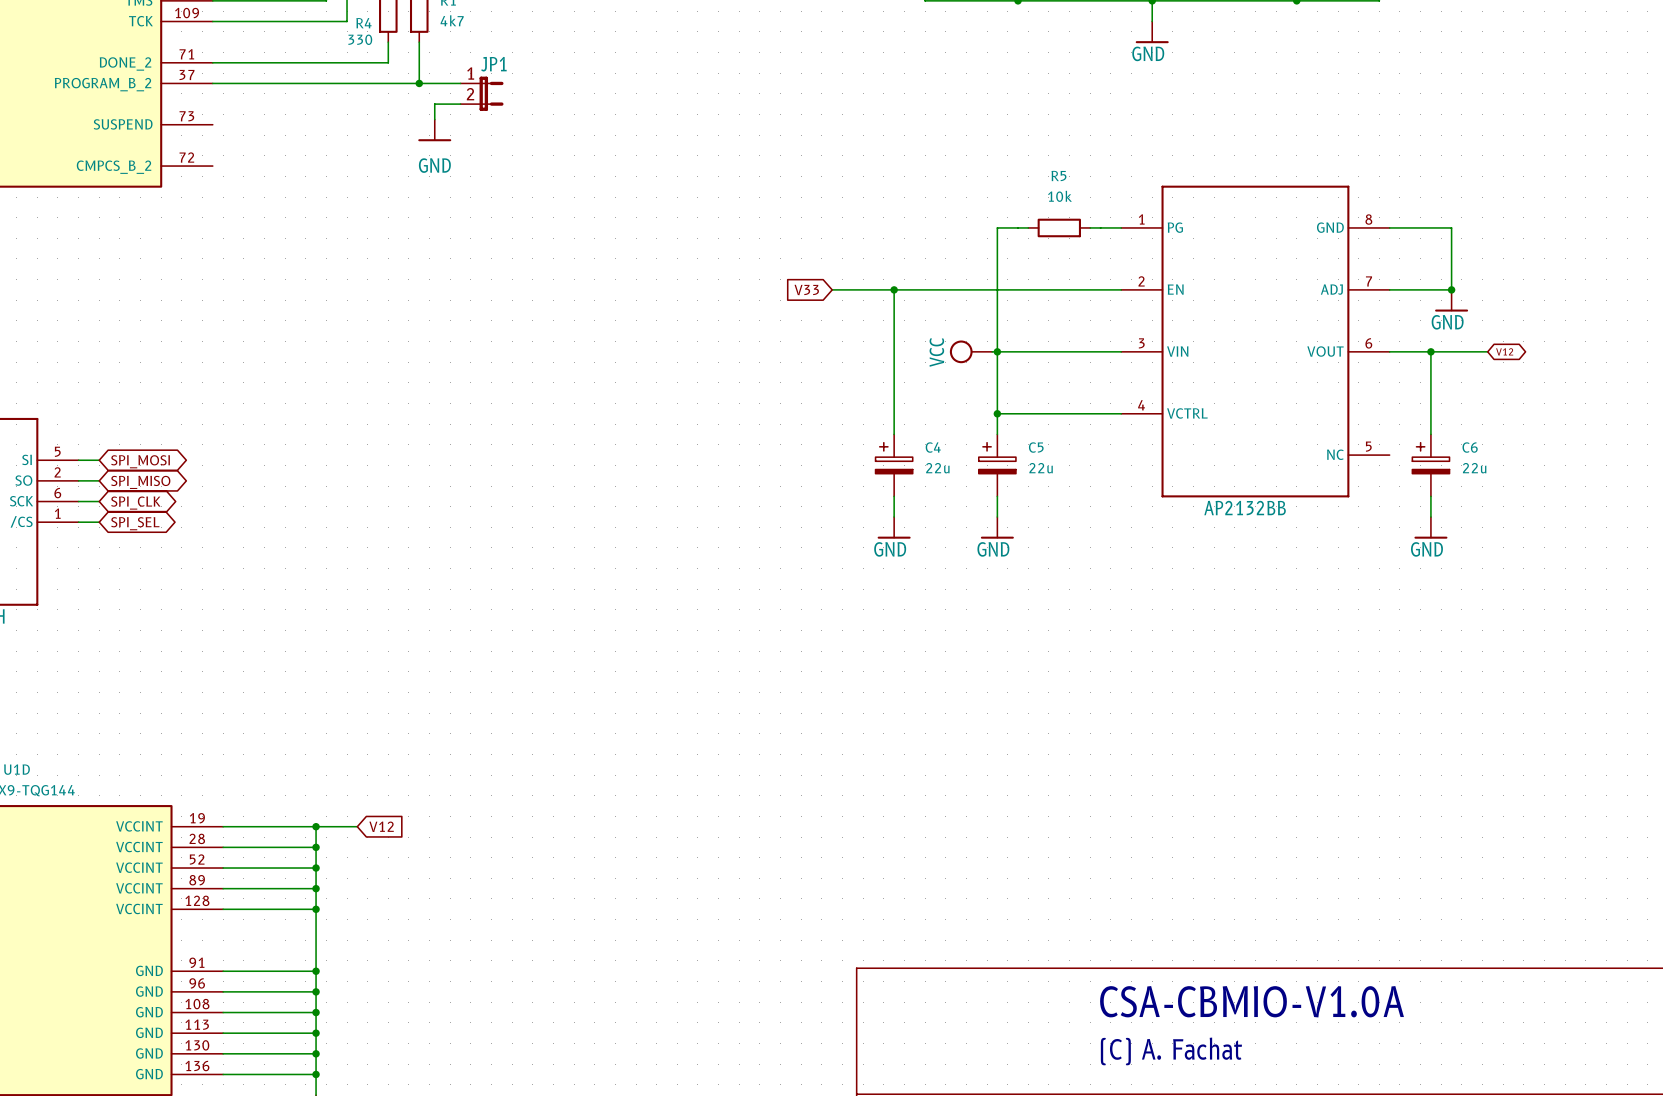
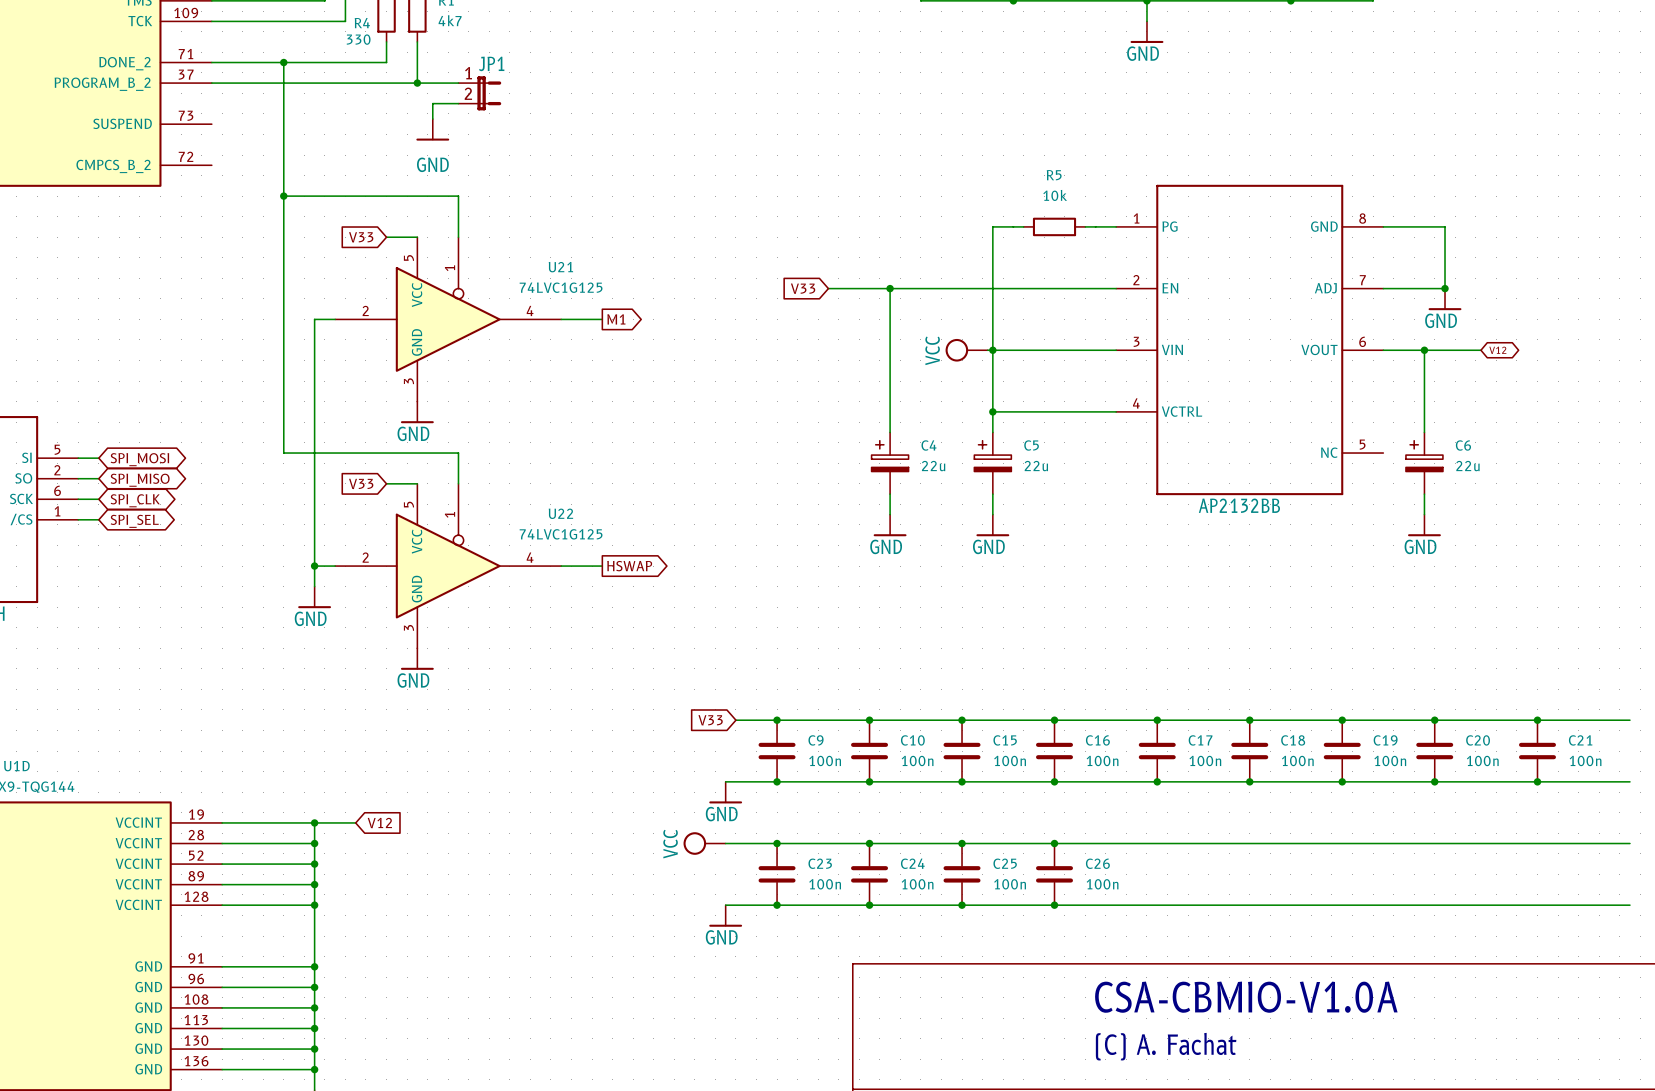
wire: none -> (283, 62) (283, 453) (458, 453) (458, 483)
junction: none -> (283, 62)
wire: none -> (283, 196) (458, 196) (458, 237)
junction: none -> (283, 196)
global label: none -> V33 (361, 237)
wire: none -> (386, 237) (417, 237)
wire: none -> (335, 319) (314, 319) (314, 586)
U21: none -> 74LVC1G125 (448, 319)
wire: none -> (561, 319) (602, 319)
global label: none -> M1 (616, 319)
power symbol: none -> GND (417, 412)
global label: none -> V33 (361, 483)
wire: none -> (386, 483) (417, 483)
wire: none -> (314, 566) (335, 566)
junction: none -> (314, 566)
U22: none -> 74LVC1G125 (448, 566)
wire: none -> (561, 566) (602, 566)
global label: none -> HSWAP (629, 566)
power symbol: none -> GND (314, 597)
power symbol: none -> GND (417, 659)
global label: none -> V33 (710, 720)
wire: none -> (735, 720) (1629, 720)
junction: none -> (777, 720)
junction: none -> (869, 720)
junction: none -> (962, 720)
junction: none -> (1054, 720)
junction: none -> (1157, 720)
junction: none -> (1249, 720)
junction: none -> (1342, 720)
junction: none -> (1434, 720)
junction: none -> (1537, 720)
C9: none -> 100n (777, 751)
C10: none -> 100n (869, 751)
C15: none -> 100n (962, 751)
C16: none -> 100n (1054, 751)
C17: none -> 100n (1157, 751)
C18: none -> 100n (1249, 751)
C19: none -> 100n (1342, 751)
C20: none -> 100n (1434, 751)
C21: none -> 100n (1537, 751)
wire: none -> (725, 781) (1629, 781)
junction: none -> (777, 781)
junction: none -> (869, 781)
junction: none -> (962, 781)
junction: none -> (1054, 781)
junction: none -> (1157, 781)
junction: none -> (1249, 781)
junction: none -> (1342, 781)
junction: none -> (1434, 781)
junction: none -> (1537, 781)
power symbol: none -> GND (725, 792)
power symbol: none -> VCC (704, 843)
wire: none -> (725, 843) (1629, 843)
junction: none -> (777, 843)
junction: none -> (869, 843)
junction: none -> (962, 843)
junction: none -> (1054, 843)
C23: none -> 100n (777, 874)
C24: none -> 100n (869, 874)
C25: none -> 100n (962, 874)
C26: none -> 100n (1054, 874)
wire: none -> (725, 905) (1629, 905)
junction: none -> (777, 905)
junction: none -> (869, 905)
junction: none -> (962, 905)
junction: none -> (1054, 905)
power symbol: none -> GND (725, 915)

